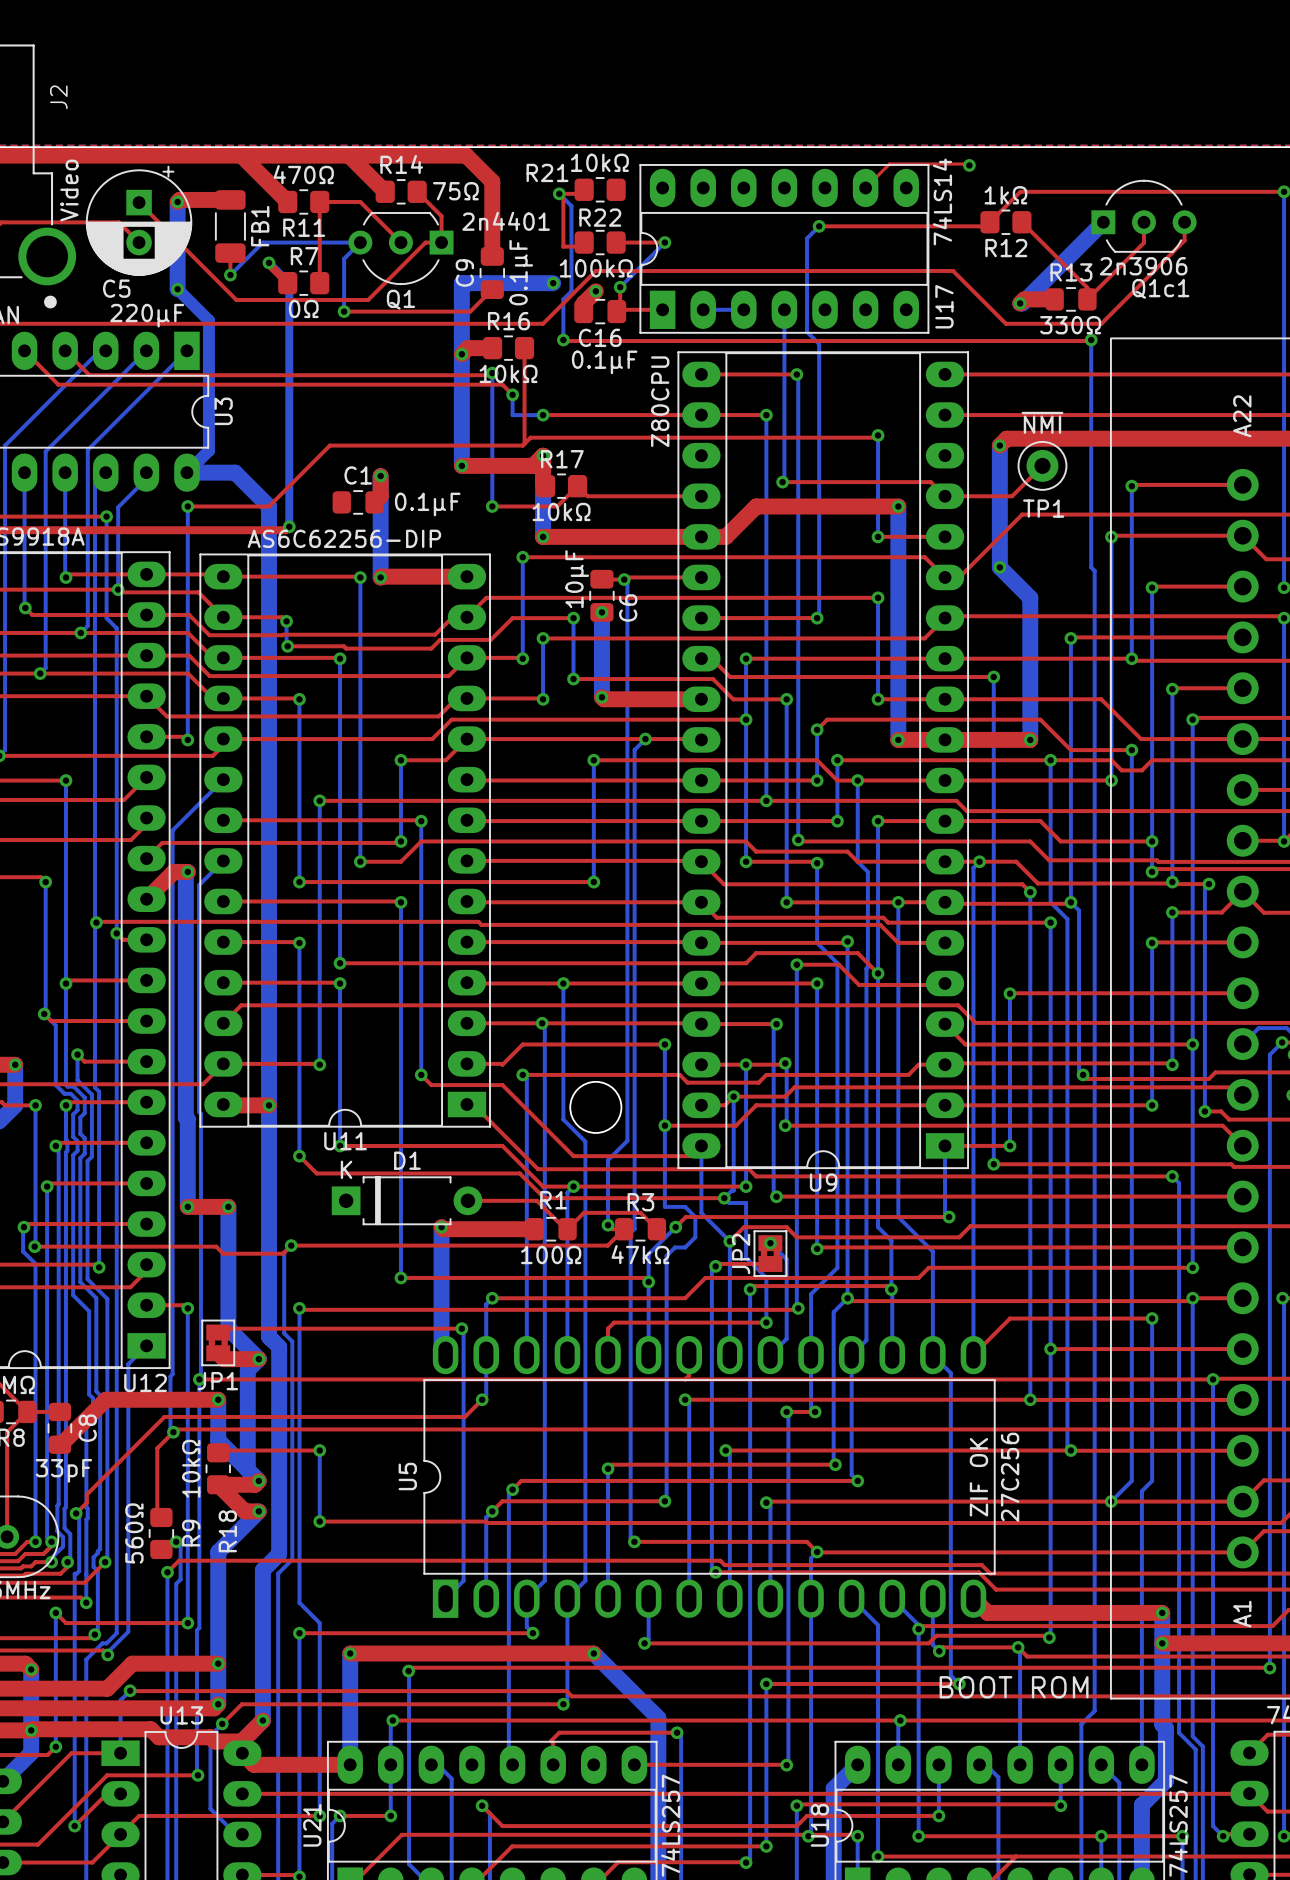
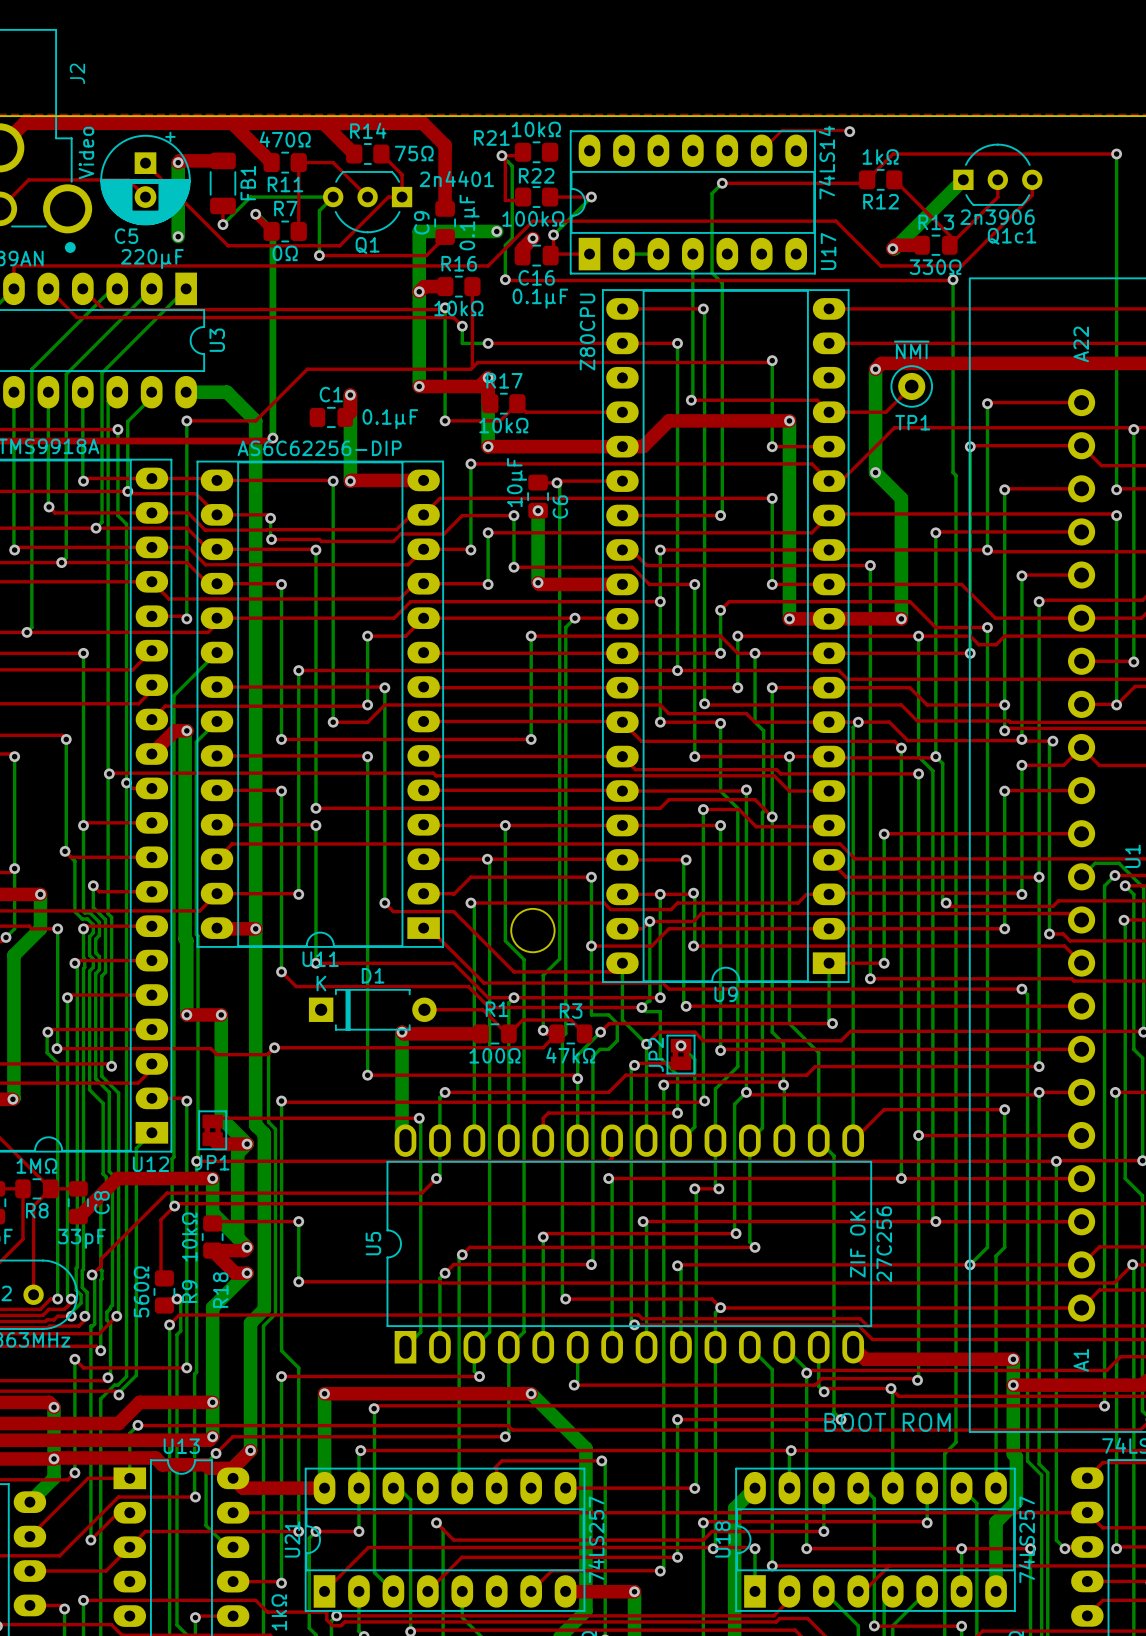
bottom track: (177, 289) (208, 320) (208, 450) (186, 472) -> none

